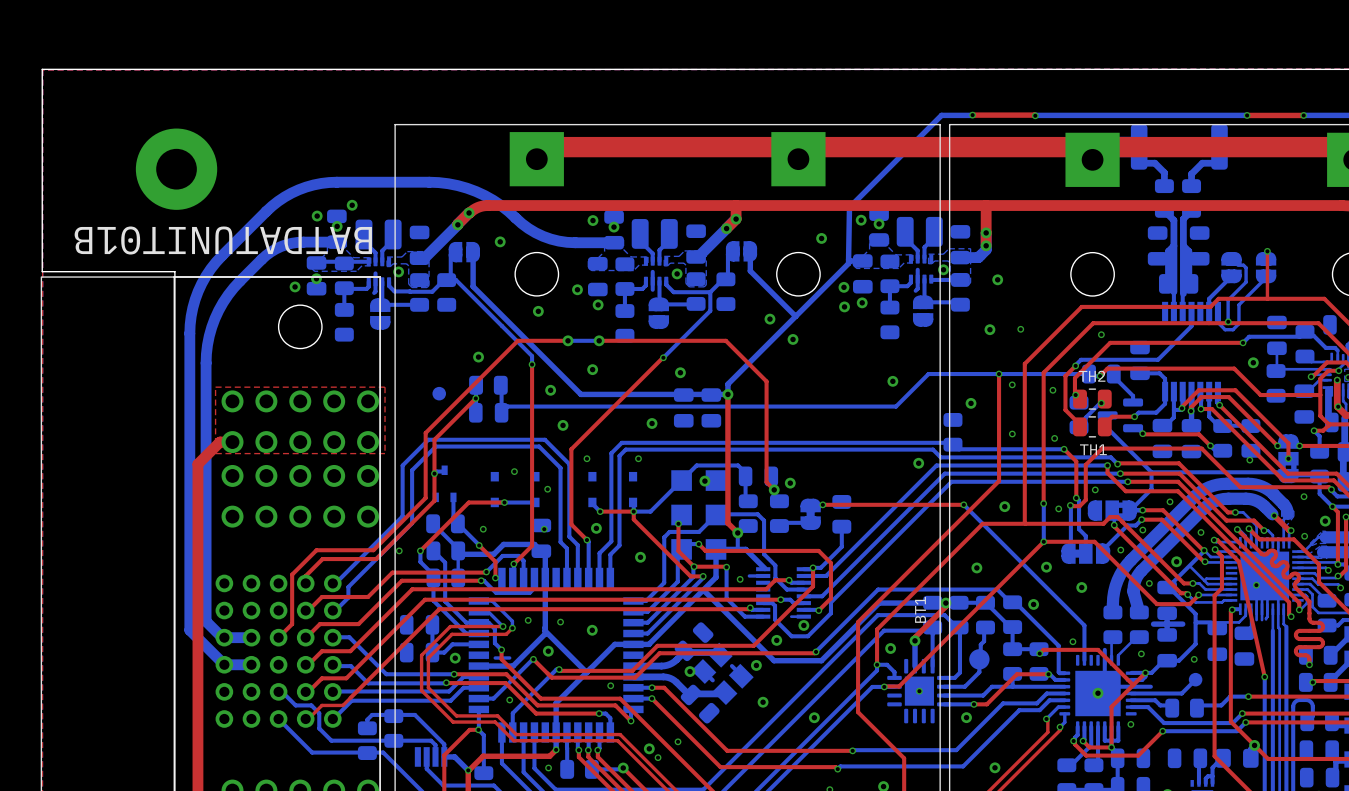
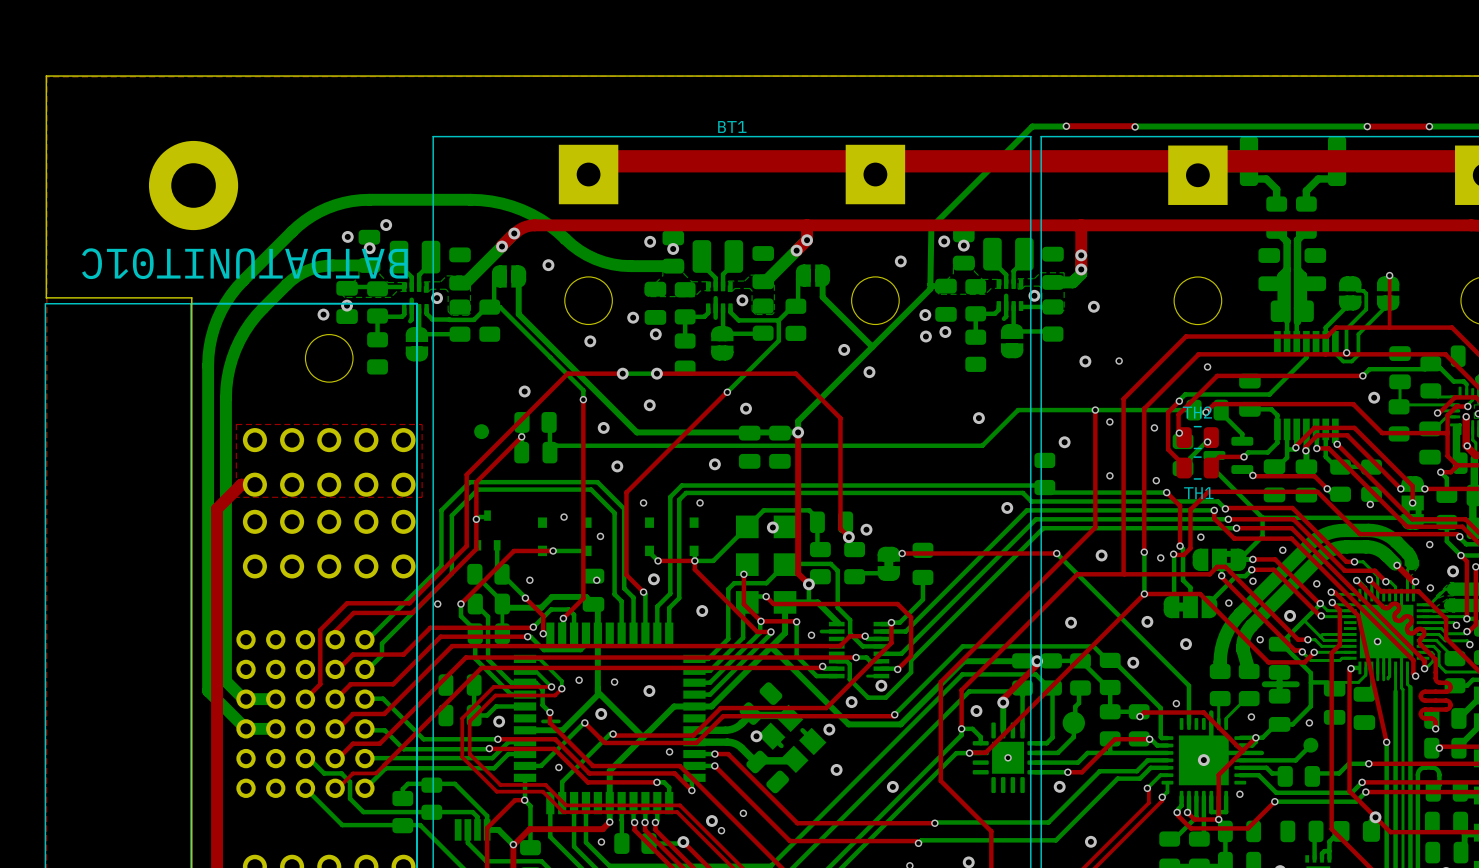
text: BATDATUNIT01B (223, 240) -> BATDATUNIT01C (244, 263)
BT1 name rotation: 0° (920, 609) -> 90° clockwise (732, 126)
BT1 name position: BT1 (920, 609) -> BT1 (732, 126)

